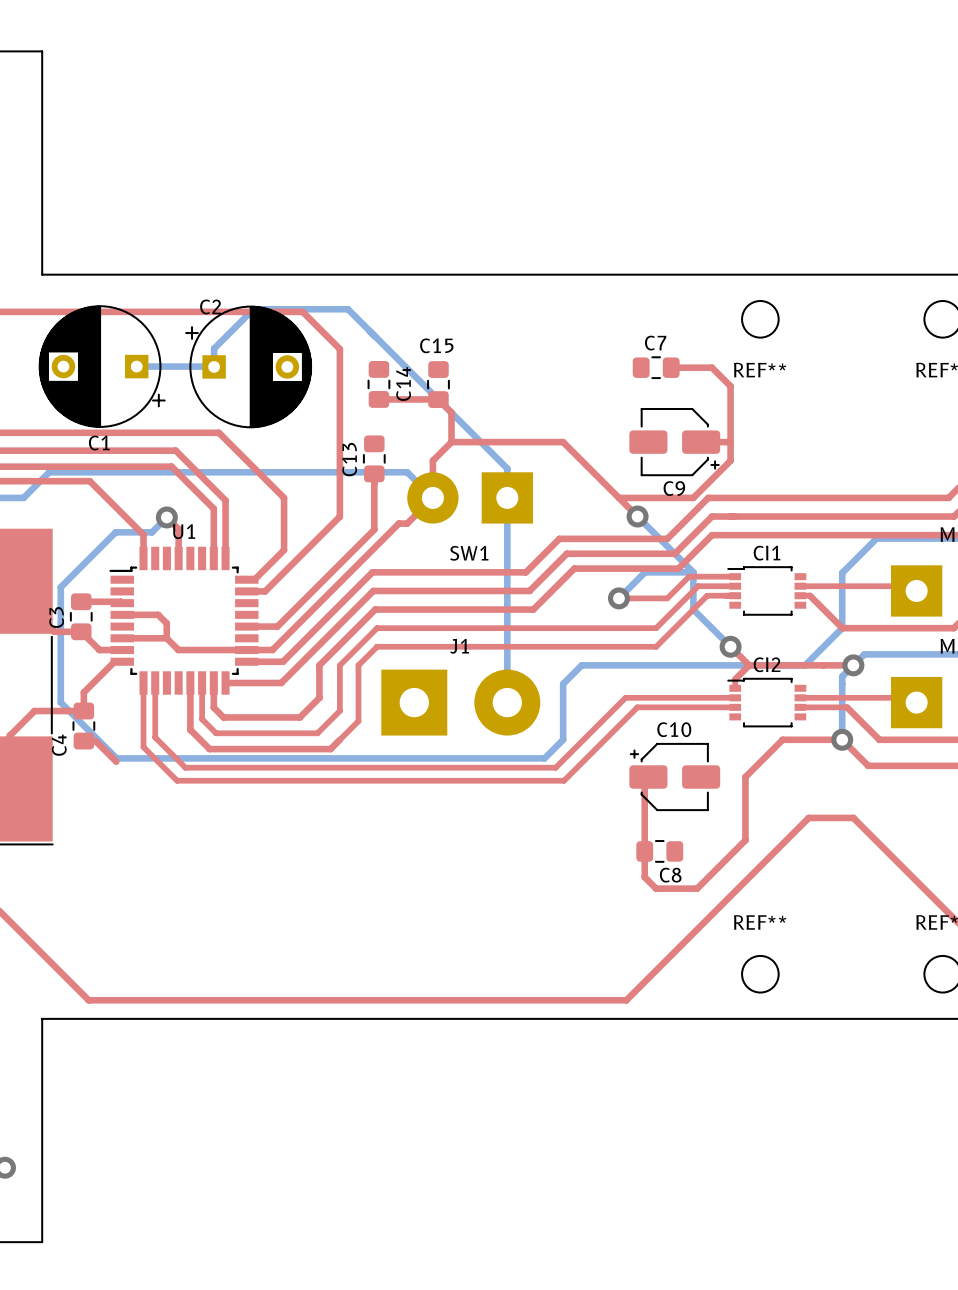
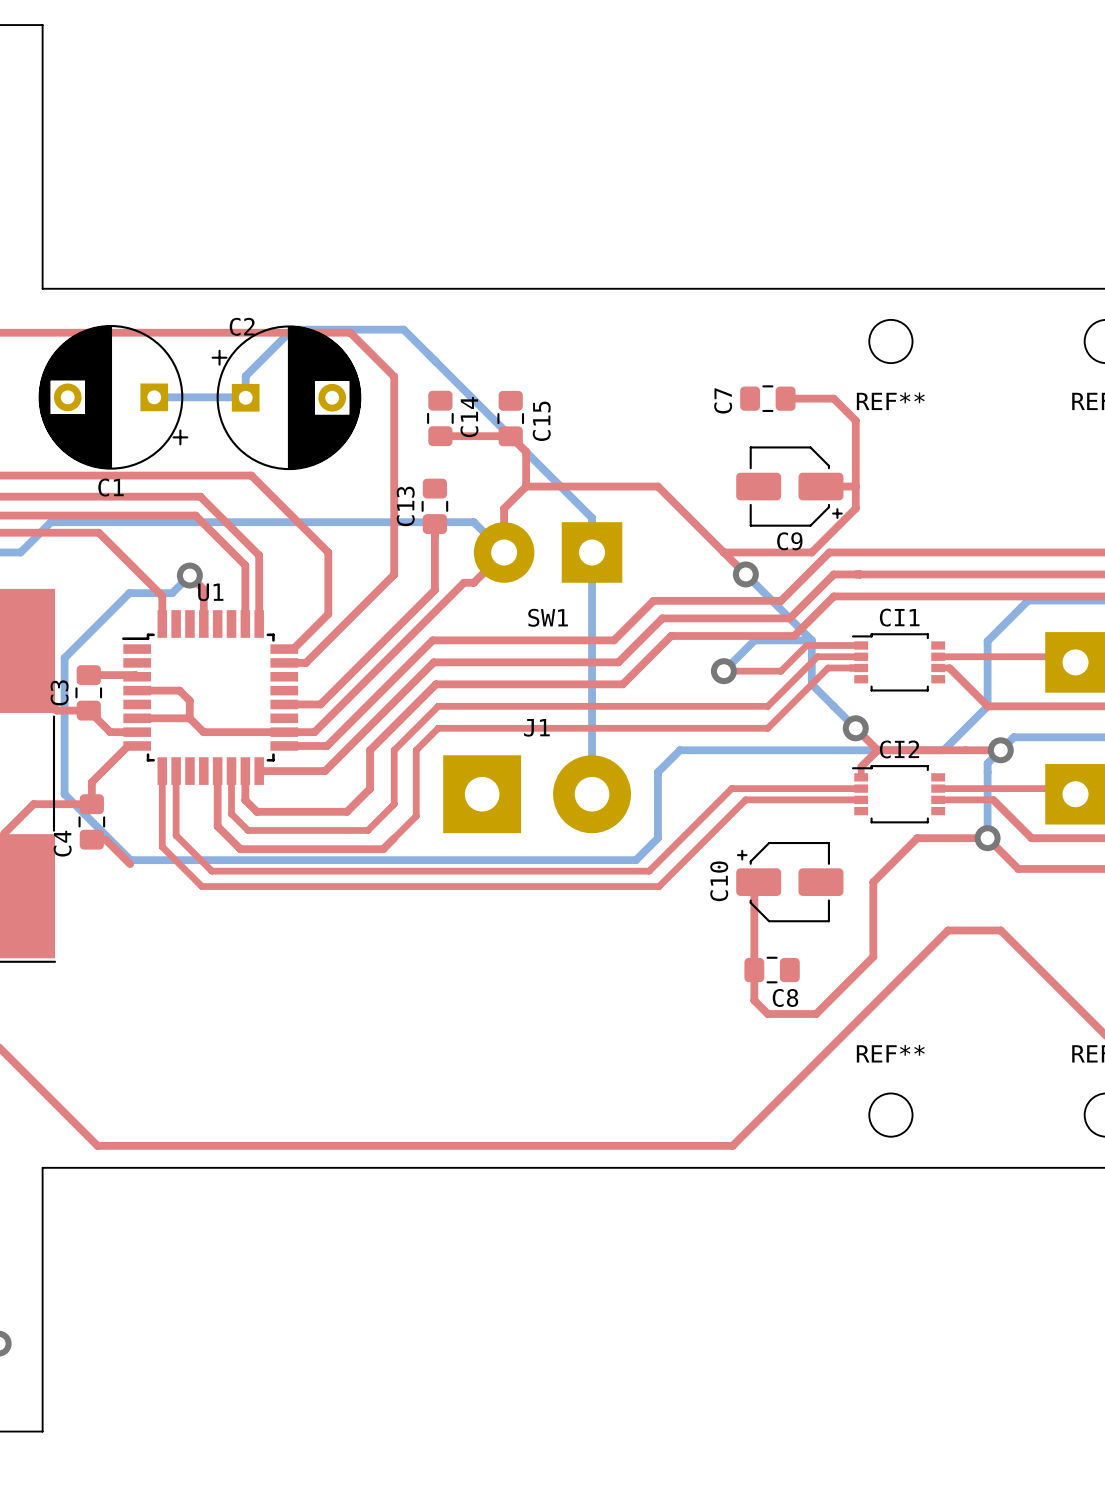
C7 name rotation: 0° (655, 343) -> 90° counterclockwise (723, 400)
C7 name position: C7 (655, 343) -> C7 (723, 400)
C15 name rotation: 0° (436, 345) -> 90° counterclockwise (541, 421)
C10 name rotation: 0° (674, 729) -> 90° counterclockwise (719, 881)
C10 name position: C10 (674, 729) -> C10 (719, 881)

